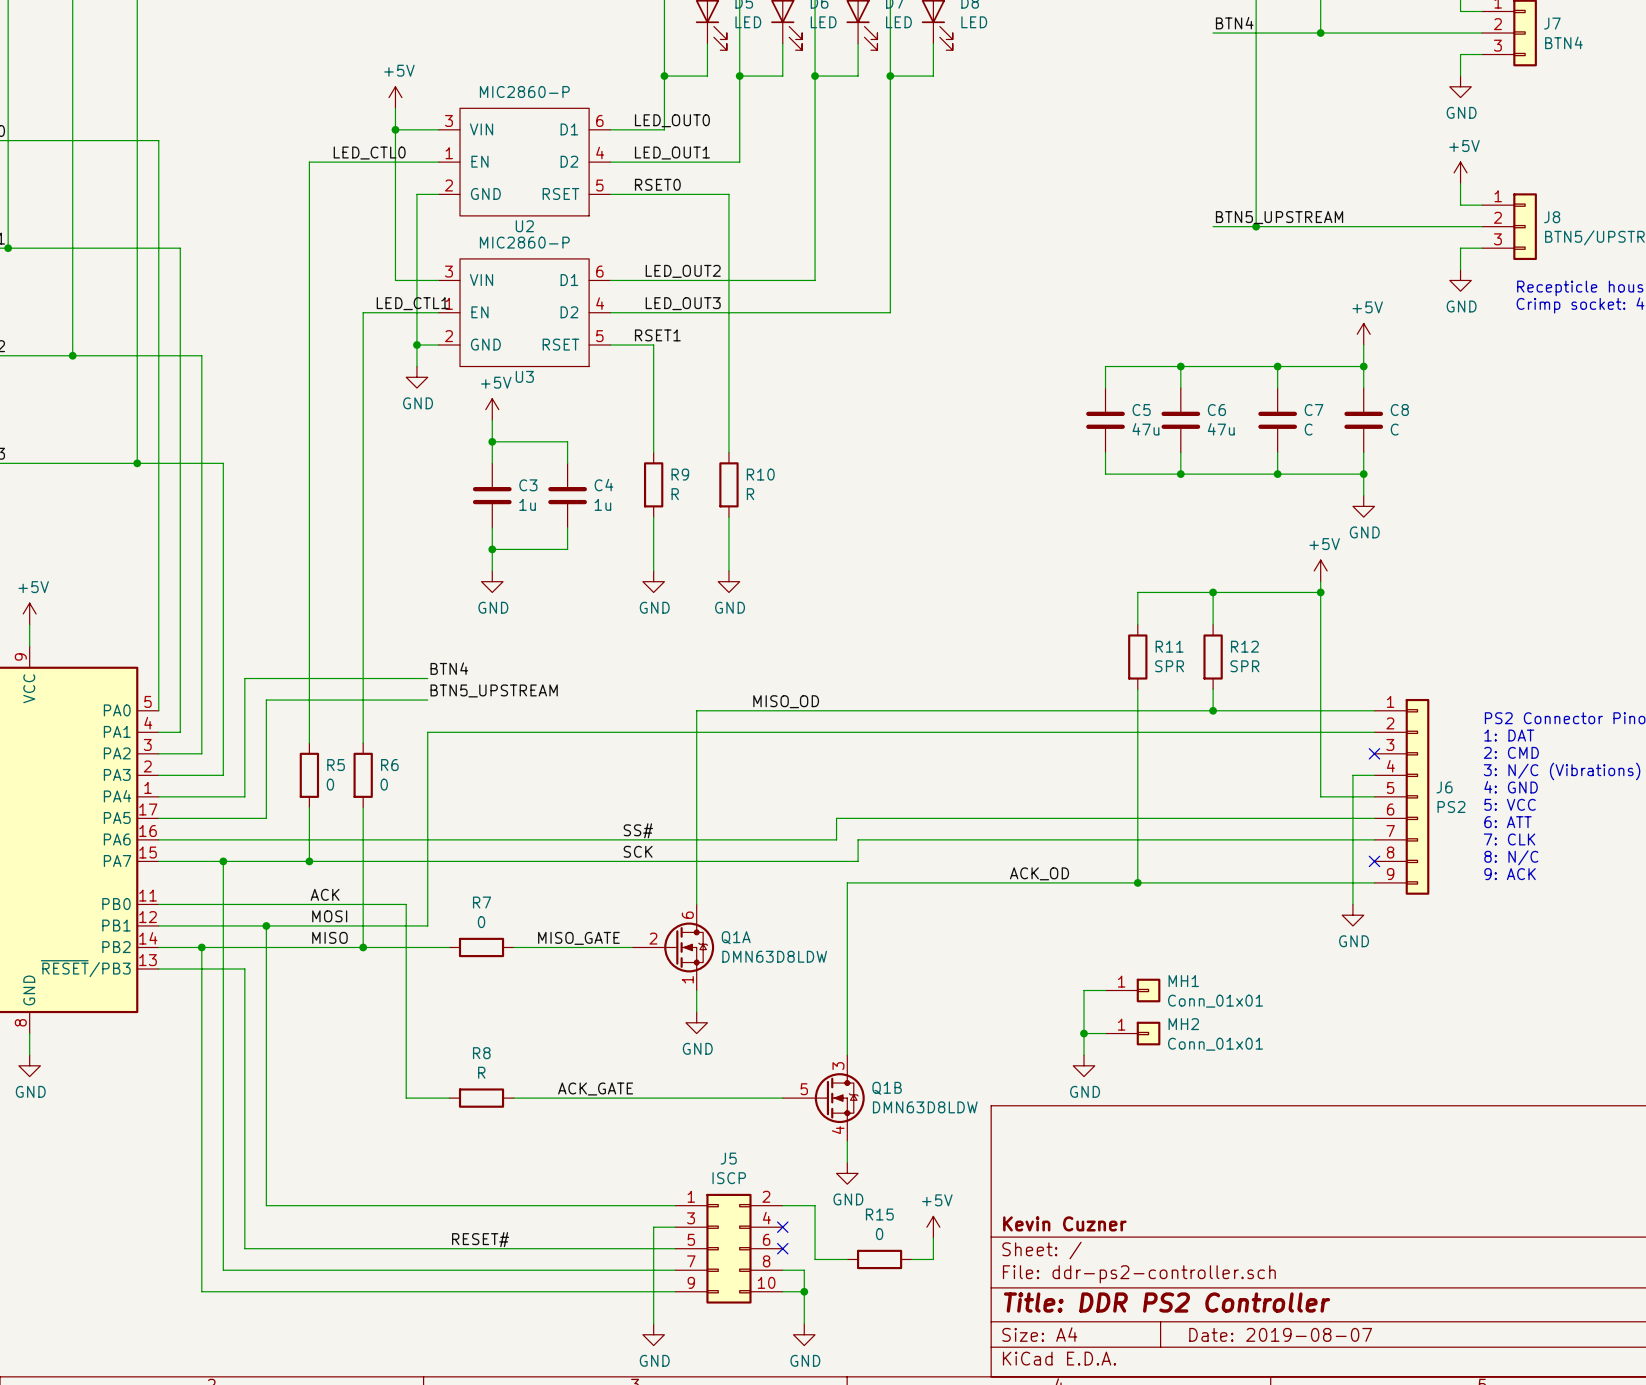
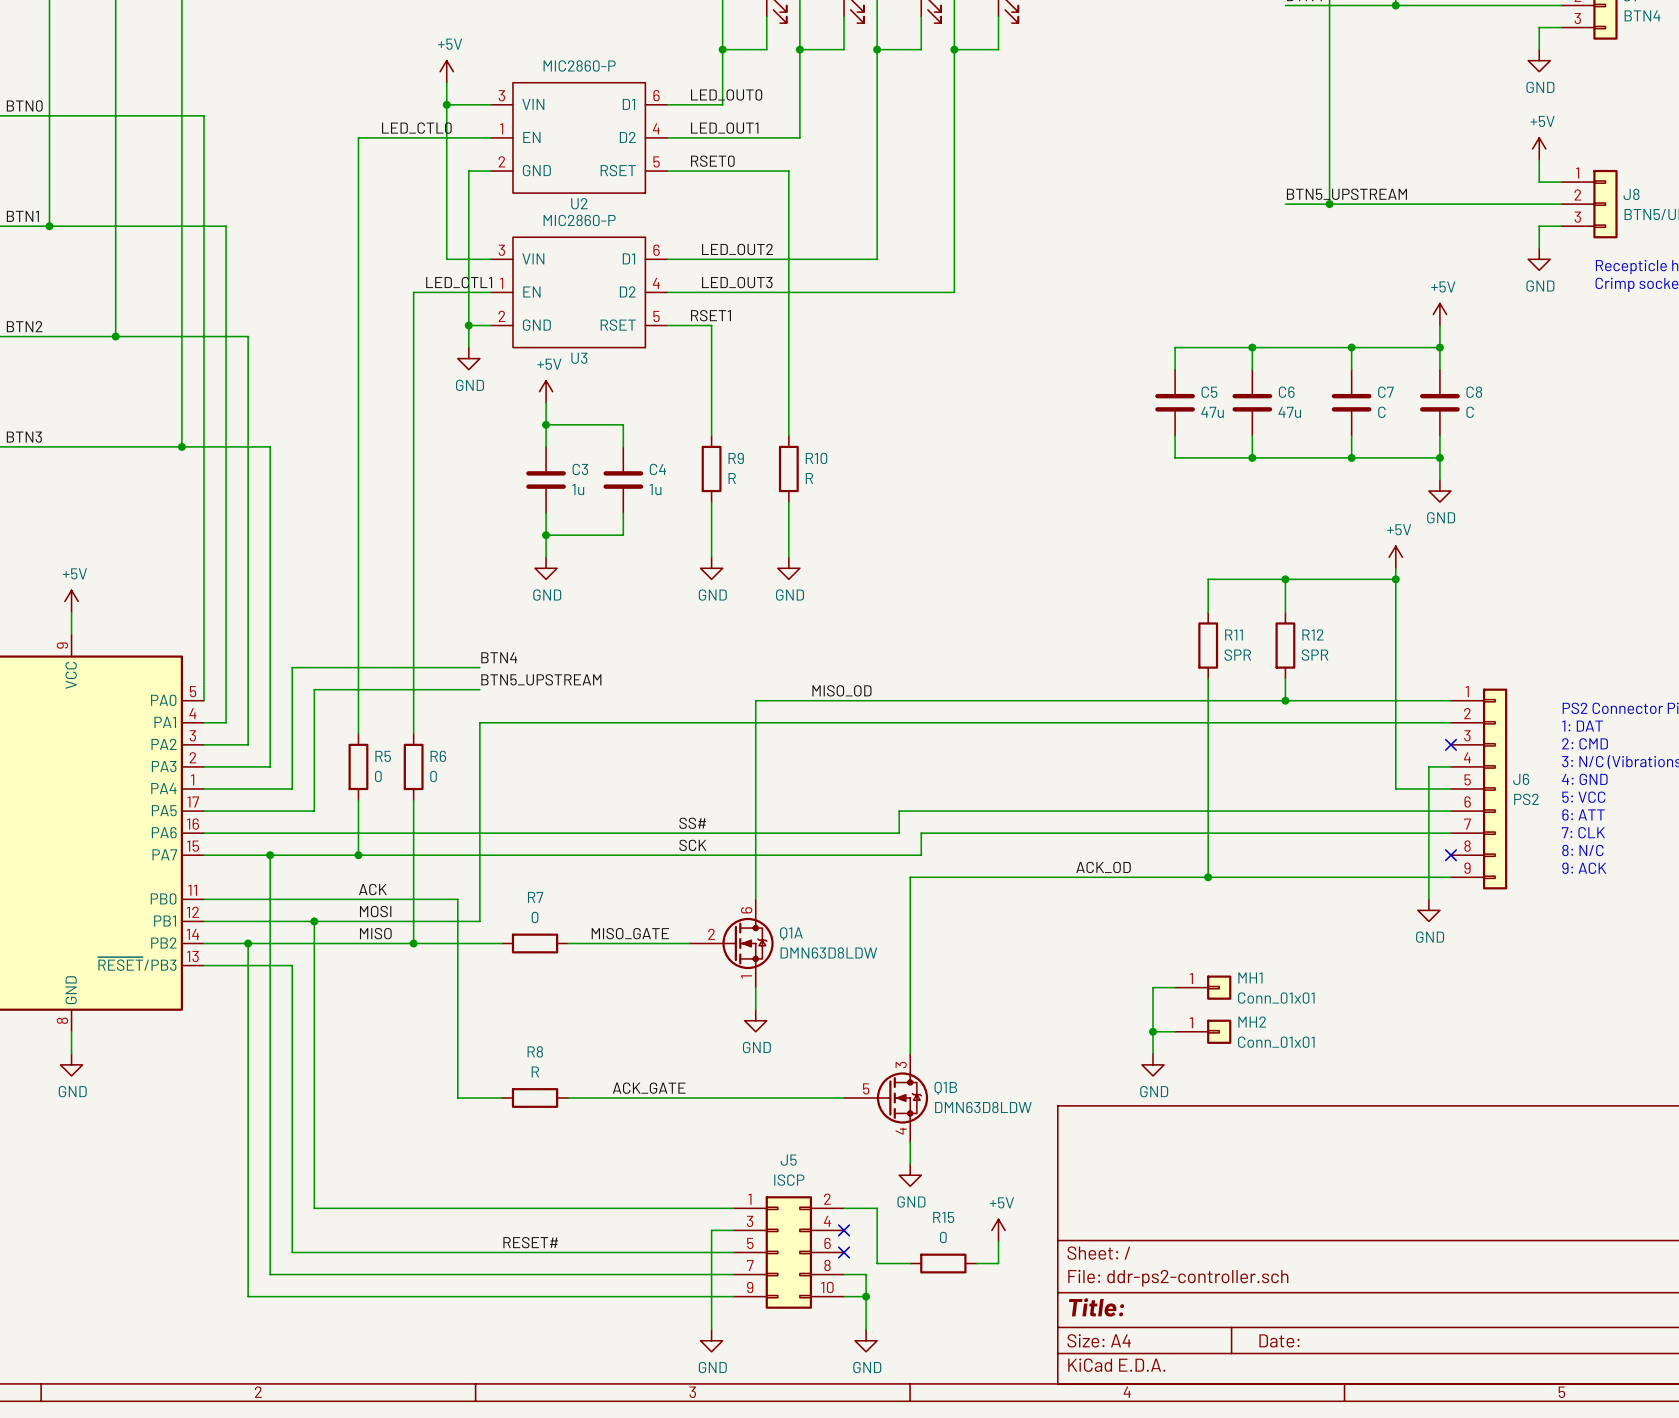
title block: Kevin Cuzner (1064, 1223) -> none
title block: Title: DDR PS2 Controller (1167, 1302) -> Title: (1096, 1307)
title block: Date: 2019-08-07 (1280, 1334) -> Date: (1279, 1340)

